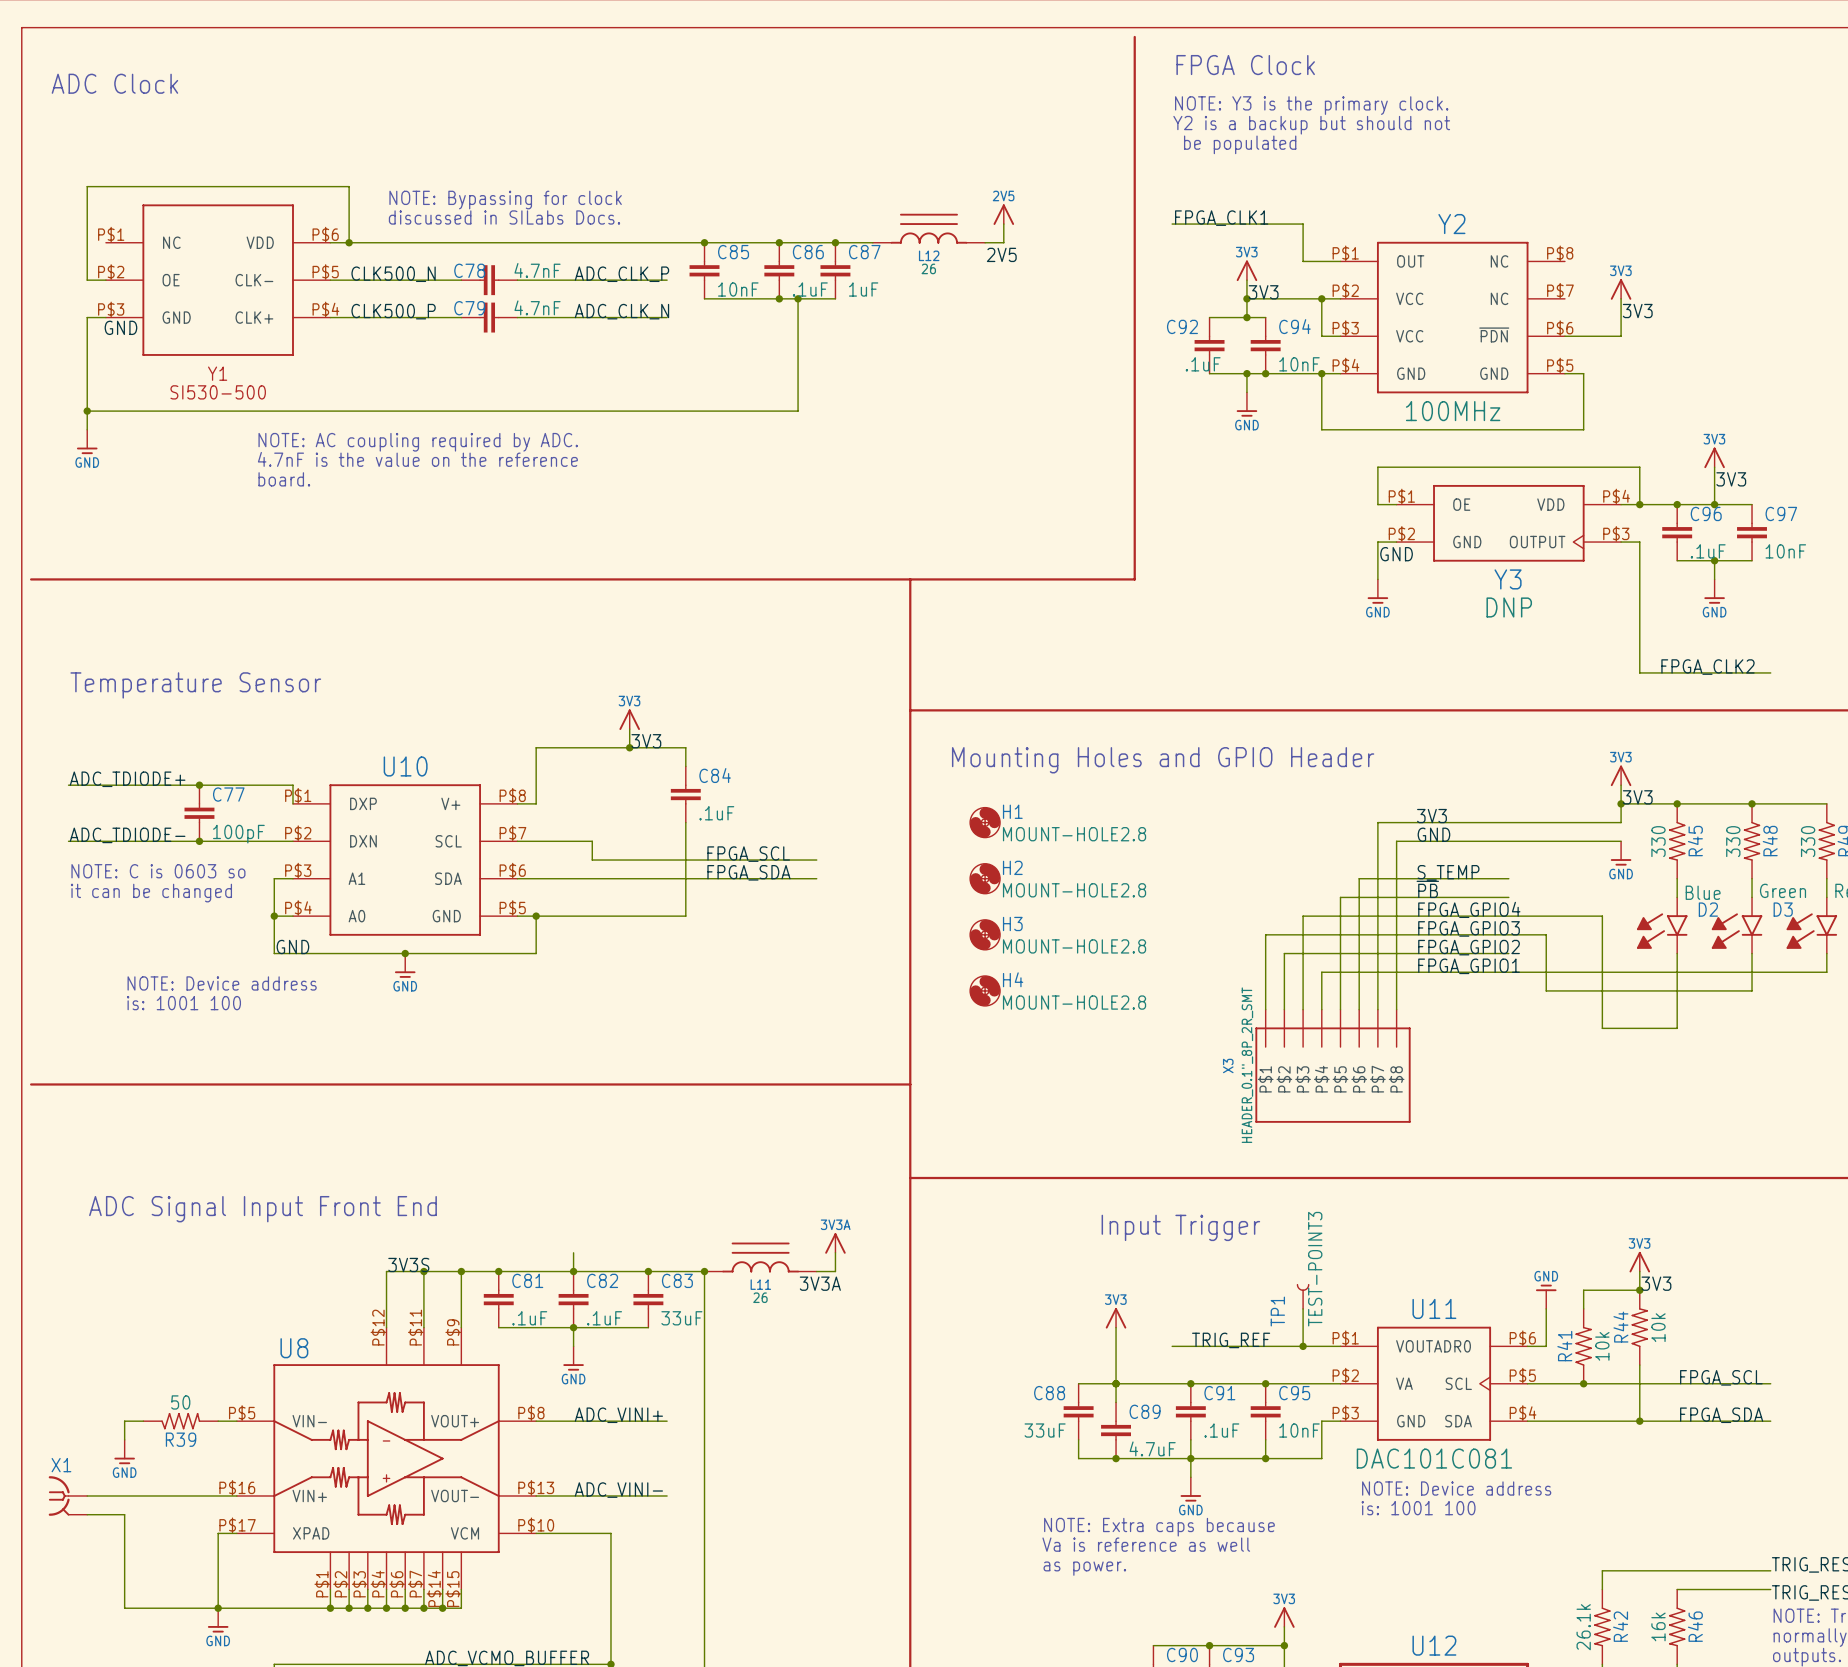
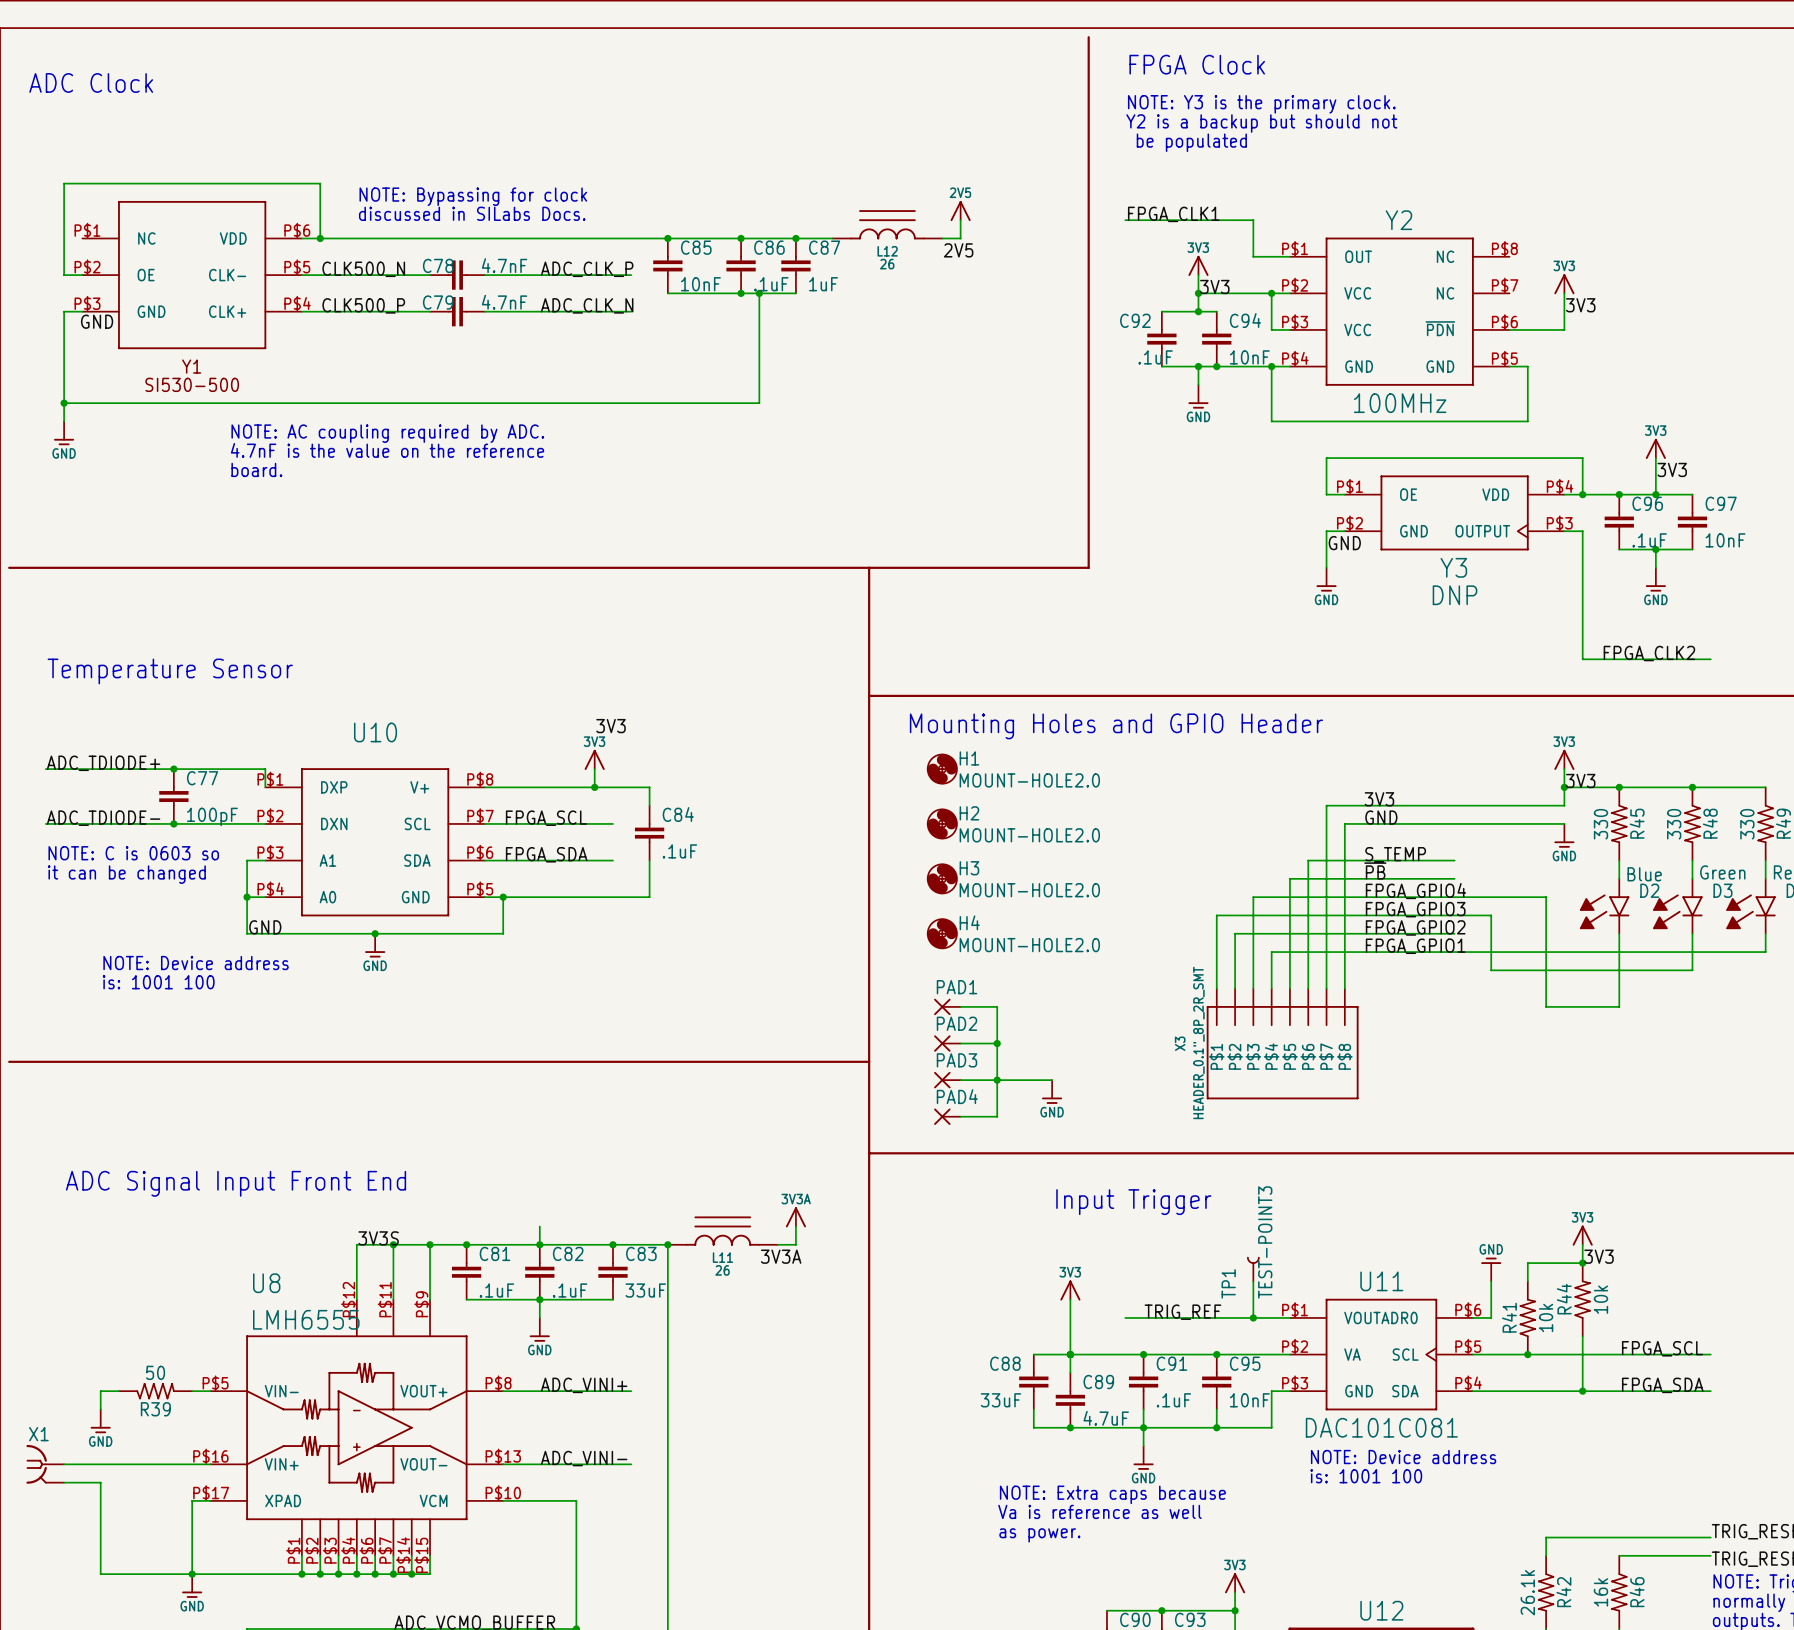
power symbol position: (629, 719) -> (594, 759)
wire: (629, 729) (629, 747) -> (594, 769) (594, 787)
junction: (629, 747) -> none
text position: Mounting Holes and GPIO Header (1163, 760) -> Mounting Holes and GPIO Header (1116, 726)
U10 name position: U10 (405, 766) -> U10 (375, 732)
wire: (685, 766) (685, 747) (536, 747) (536, 803) -> (649, 805) (649, 787) (503, 787)
C84 position: (685, 794) -> (649, 833)
junction: none -> (594, 787)
H1 position: (985, 822) -> (942, 769)
H1 value: MOUNT-HOLE2.8 (1074, 834) -> MOUNT-HOLE2.0 (1029, 780)
wire: (592, 841) (592, 860) (816, 860) -> (558, 823) (612, 823)
label position: FPGA_SCL (748, 854) -> FPGA_SCL (546, 818)
label position: FPGA_SDA (748, 872) -> FPGA_SDA (546, 854)
wire: (648, 878) (816, 878) -> none
H2 position: (985, 878) -> (942, 823)
H2 value: MOUNT-HOLE2.8 (1074, 890) -> MOUNT-HOLE2.0 (1029, 835)
H3 position: (985, 934) -> (942, 878)
H3 value: MOUNT-HOLE2.8 (1074, 946) -> MOUNT-HOLE2.0 (1029, 890)
H4 position: (985, 990) -> (942, 933)
H4 value: MOUNT-HOLE2.8 (1074, 1002) -> MOUNT-HOLE2.0 (1029, 945)
PAD1: none -> (947, 1006)
wire: none -> (960, 1006) (997, 1006) (997, 1116) (960, 1116)
PAD2: none -> (947, 1043)
wire: none -> (960, 1043) (997, 1043)
junction: none -> (997, 1043)
PAD3: none -> (947, 1080)
wire: none -> (960, 1080) (1052, 1080)
junction: none -> (997, 1080)
power symbol: none -> (1052, 1092)
PAD4: none -> (947, 1116)
U8 name position: U8 (294, 1348) -> U8 (266, 1283)
U8 value: none -> LMH6555 (306, 1319)

